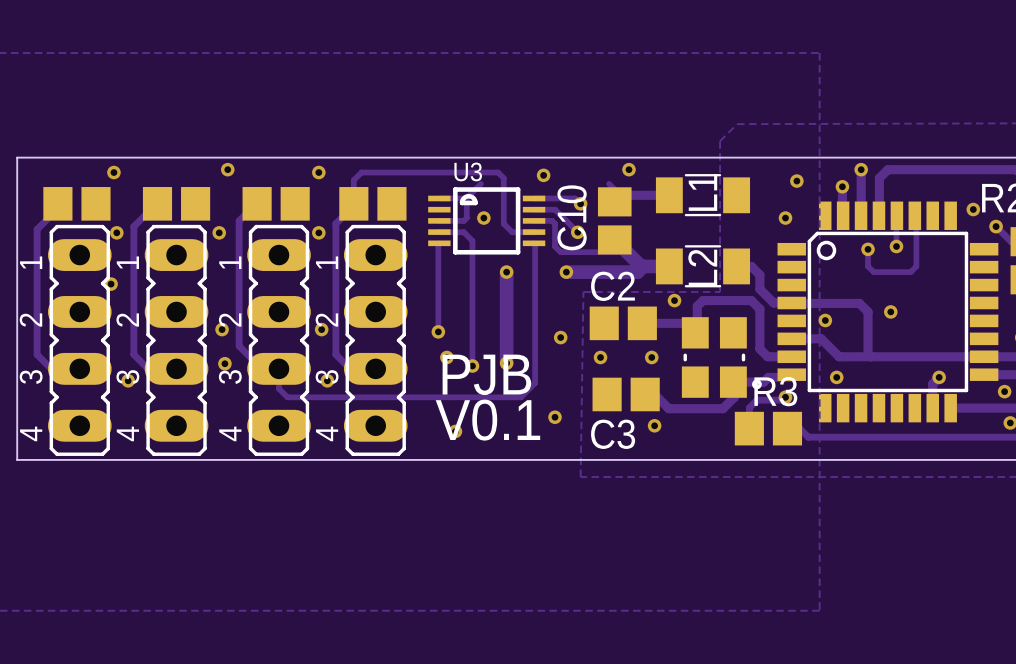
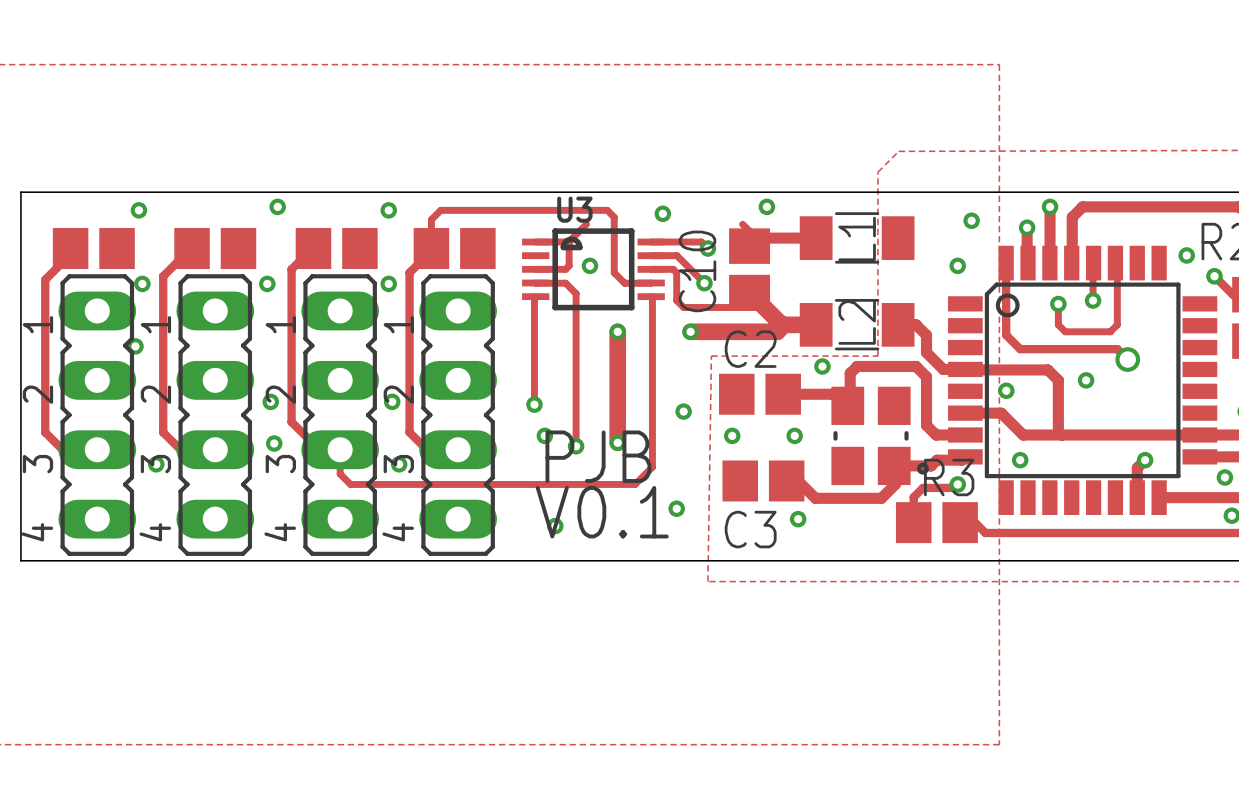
track: none -> (1006, 263) (1006, 335) (1020, 349) (1117, 349) (1127, 359)
via: none -> (1127, 359)

